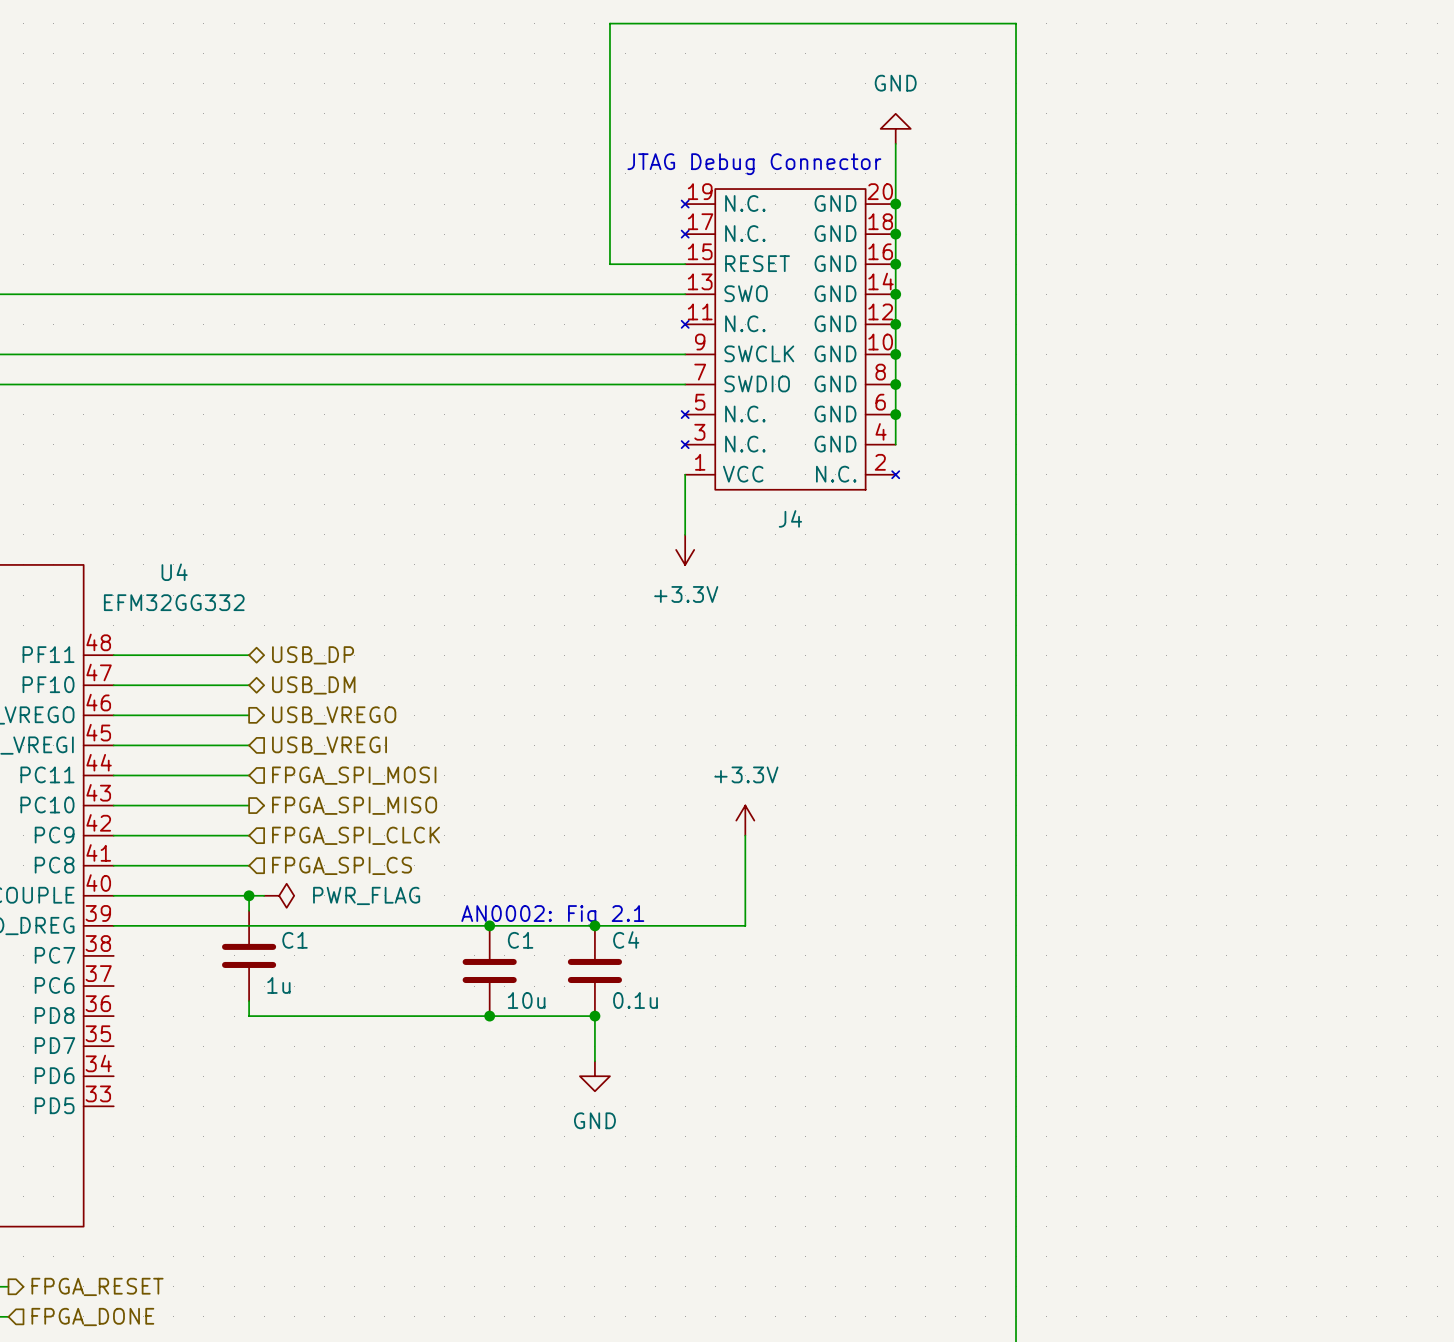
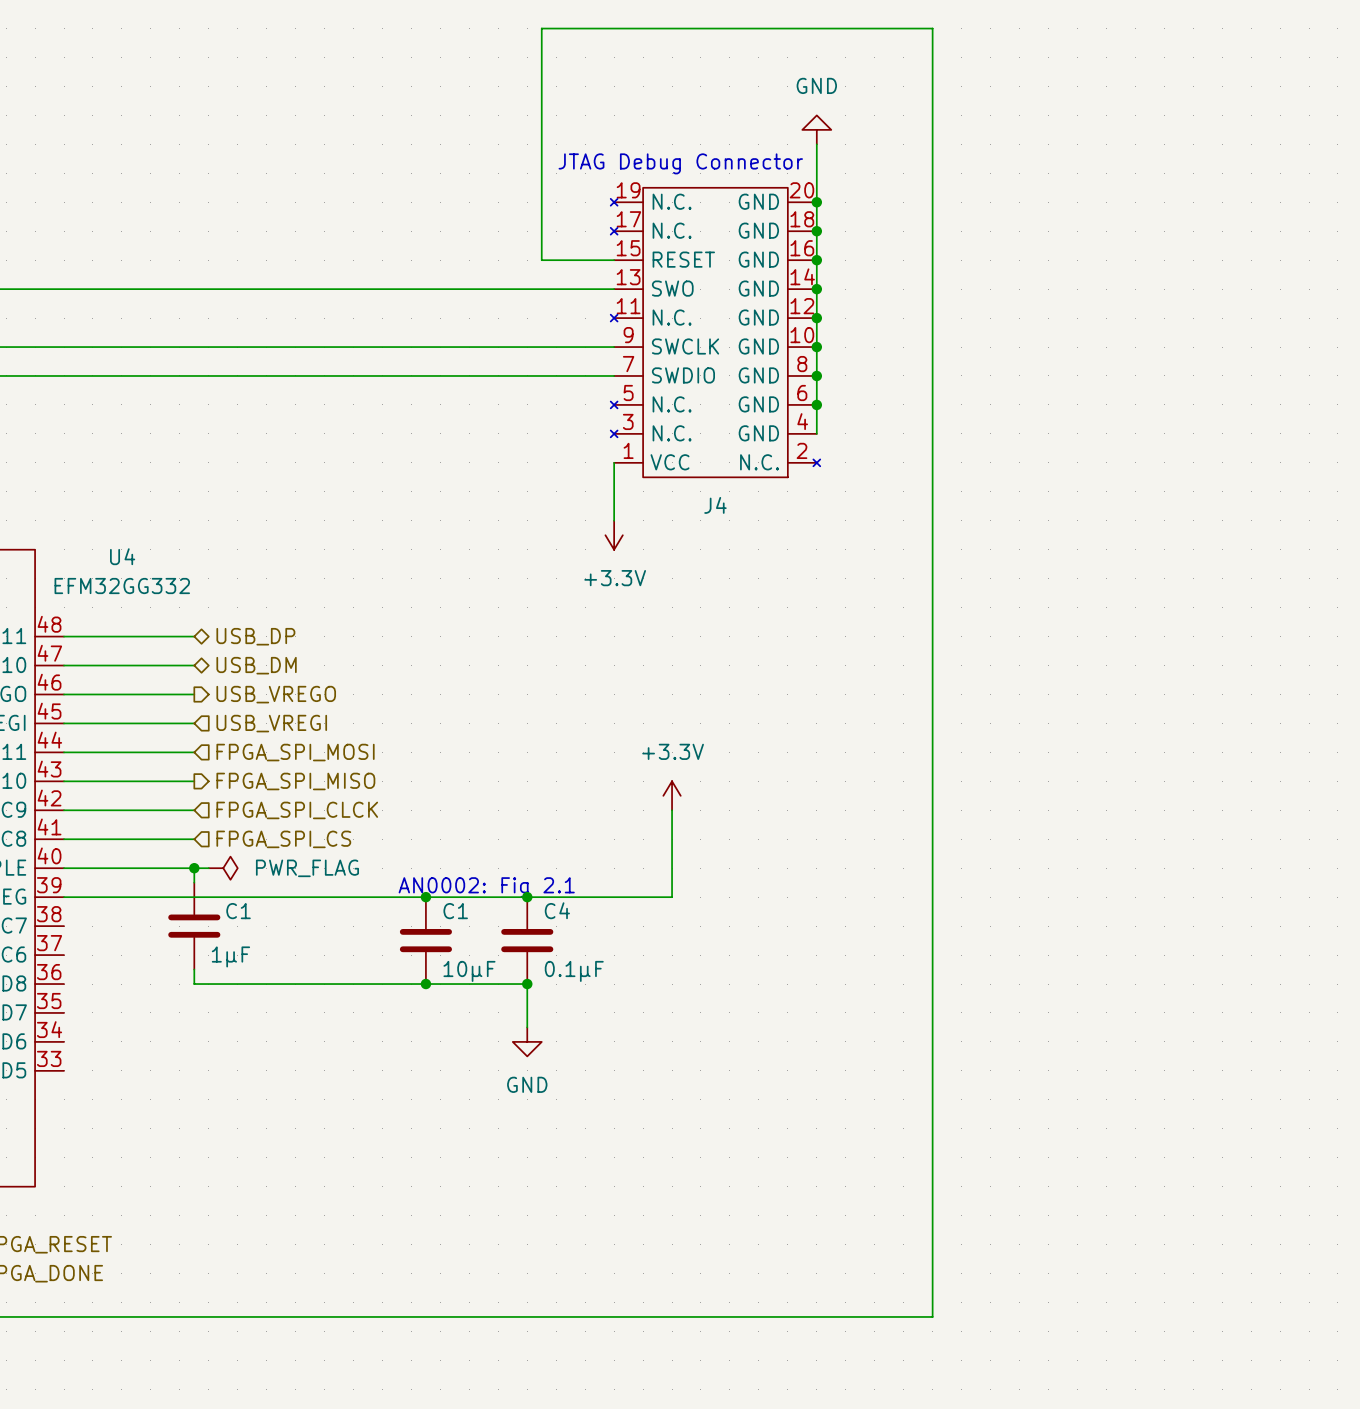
C1 value: 1u (278, 985) -> 1µF (230, 956)
C1 value: 10u (526, 1000) -> 10µF (469, 971)
C4 value: 0.1u (635, 1000) -> 0.1µF (574, 971)

